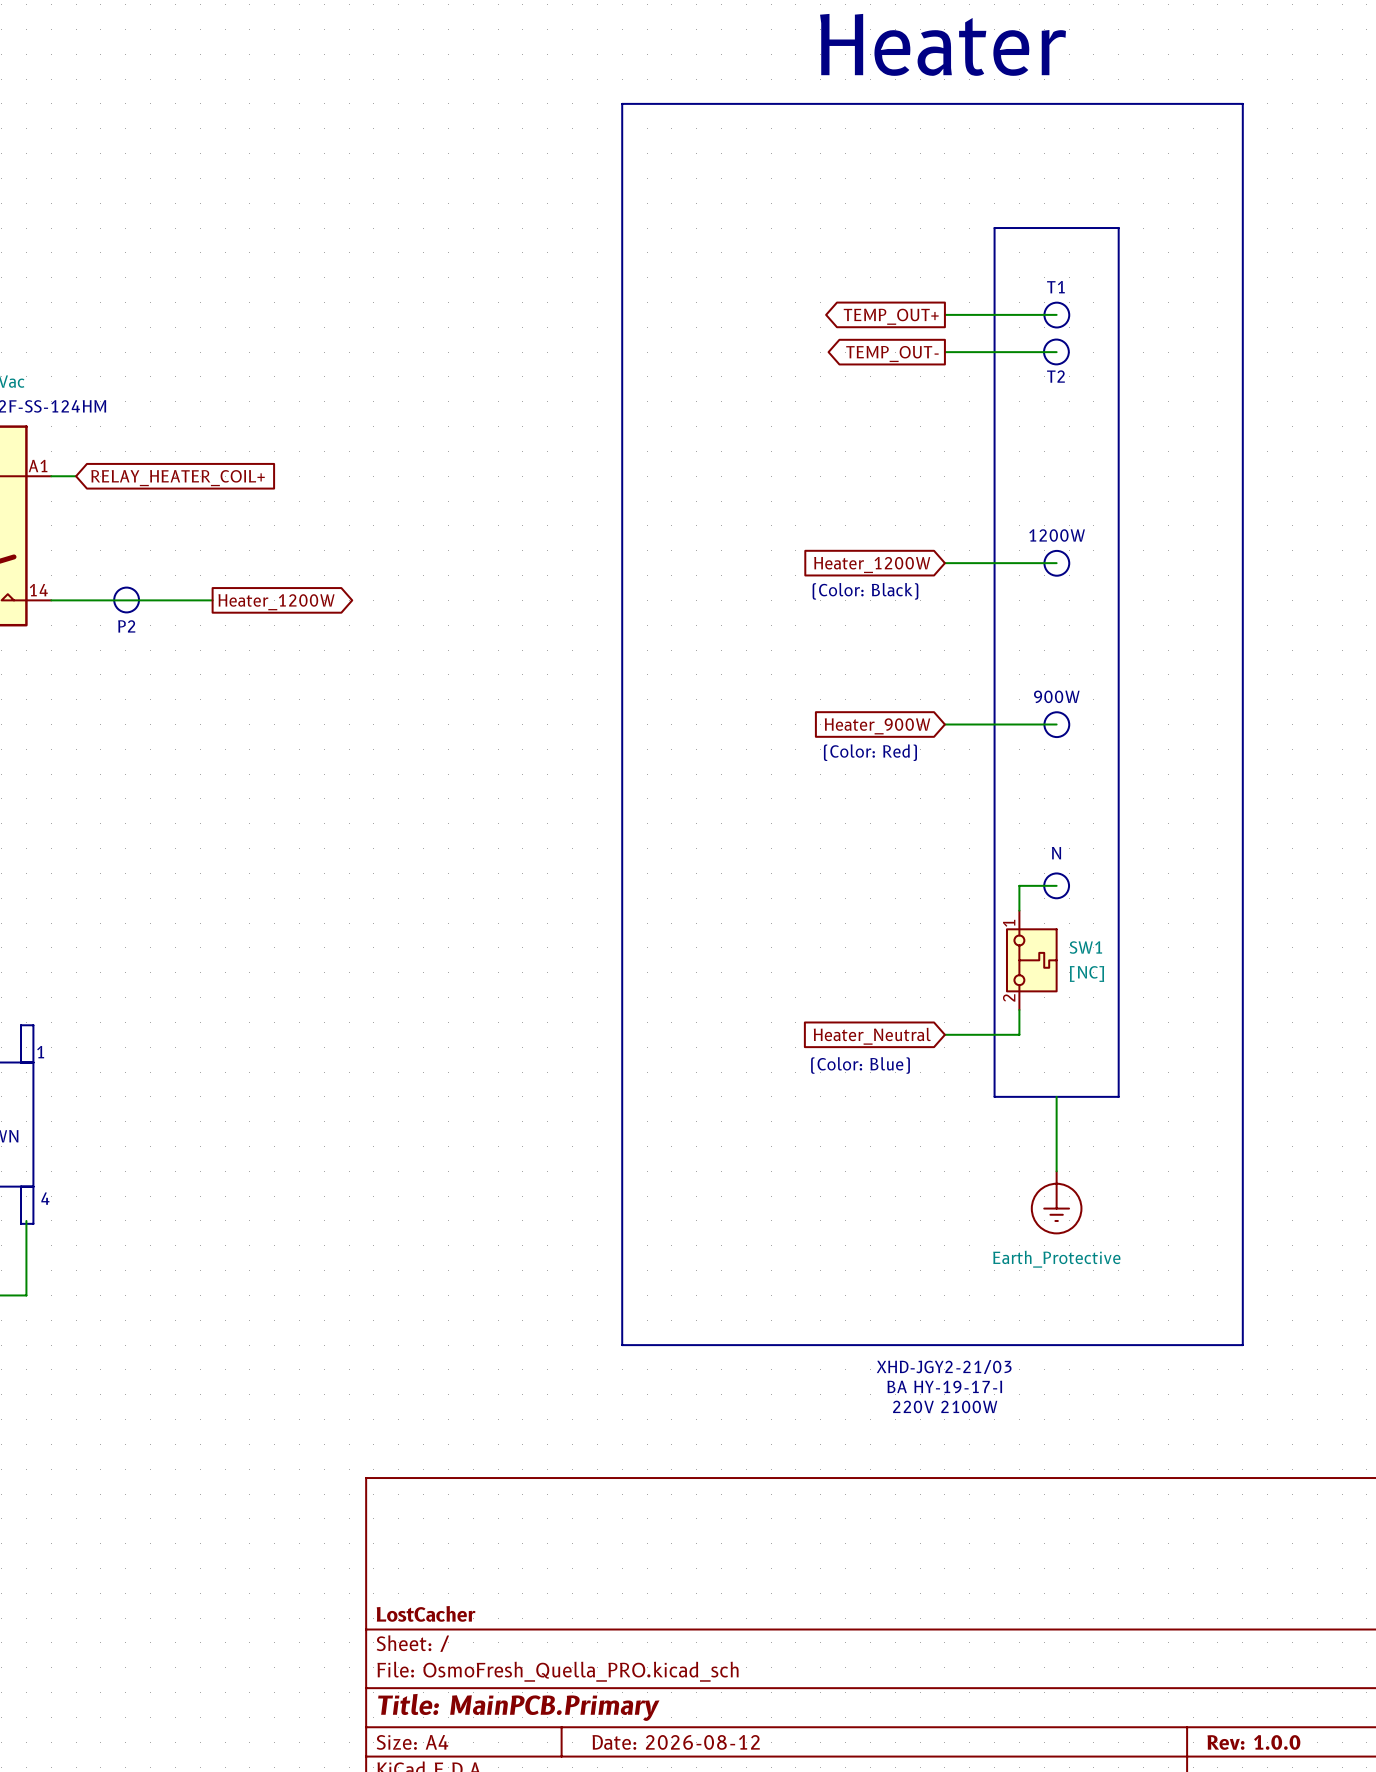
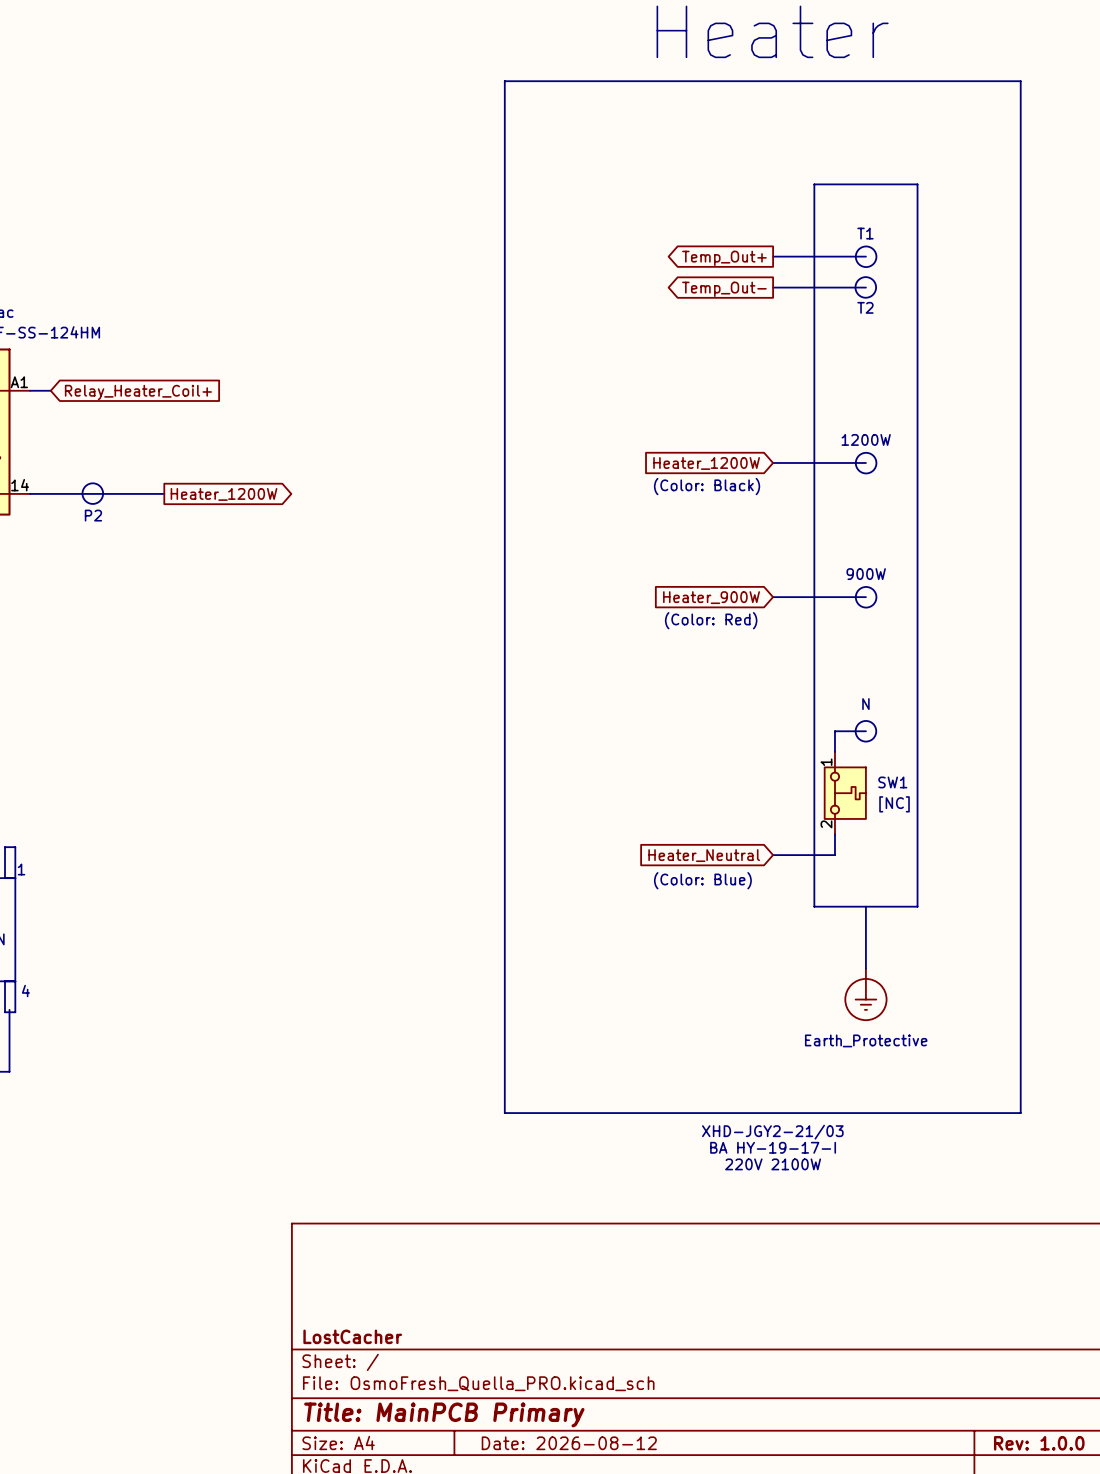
global label: TEMP_OUT+ (891, 316) -> Temp_Out+ (724, 258)
global label: TEMP_OUT- (892, 353) -> Temp_Out- (724, 289)
global label: RELAY_HEATER_COIL+ (178, 478) -> Relay_Heater_Coil+ (138, 392)
title block: Title: MainPCB.Primary (518, 1707) -> Title: MainPCB Primary (444, 1414)

